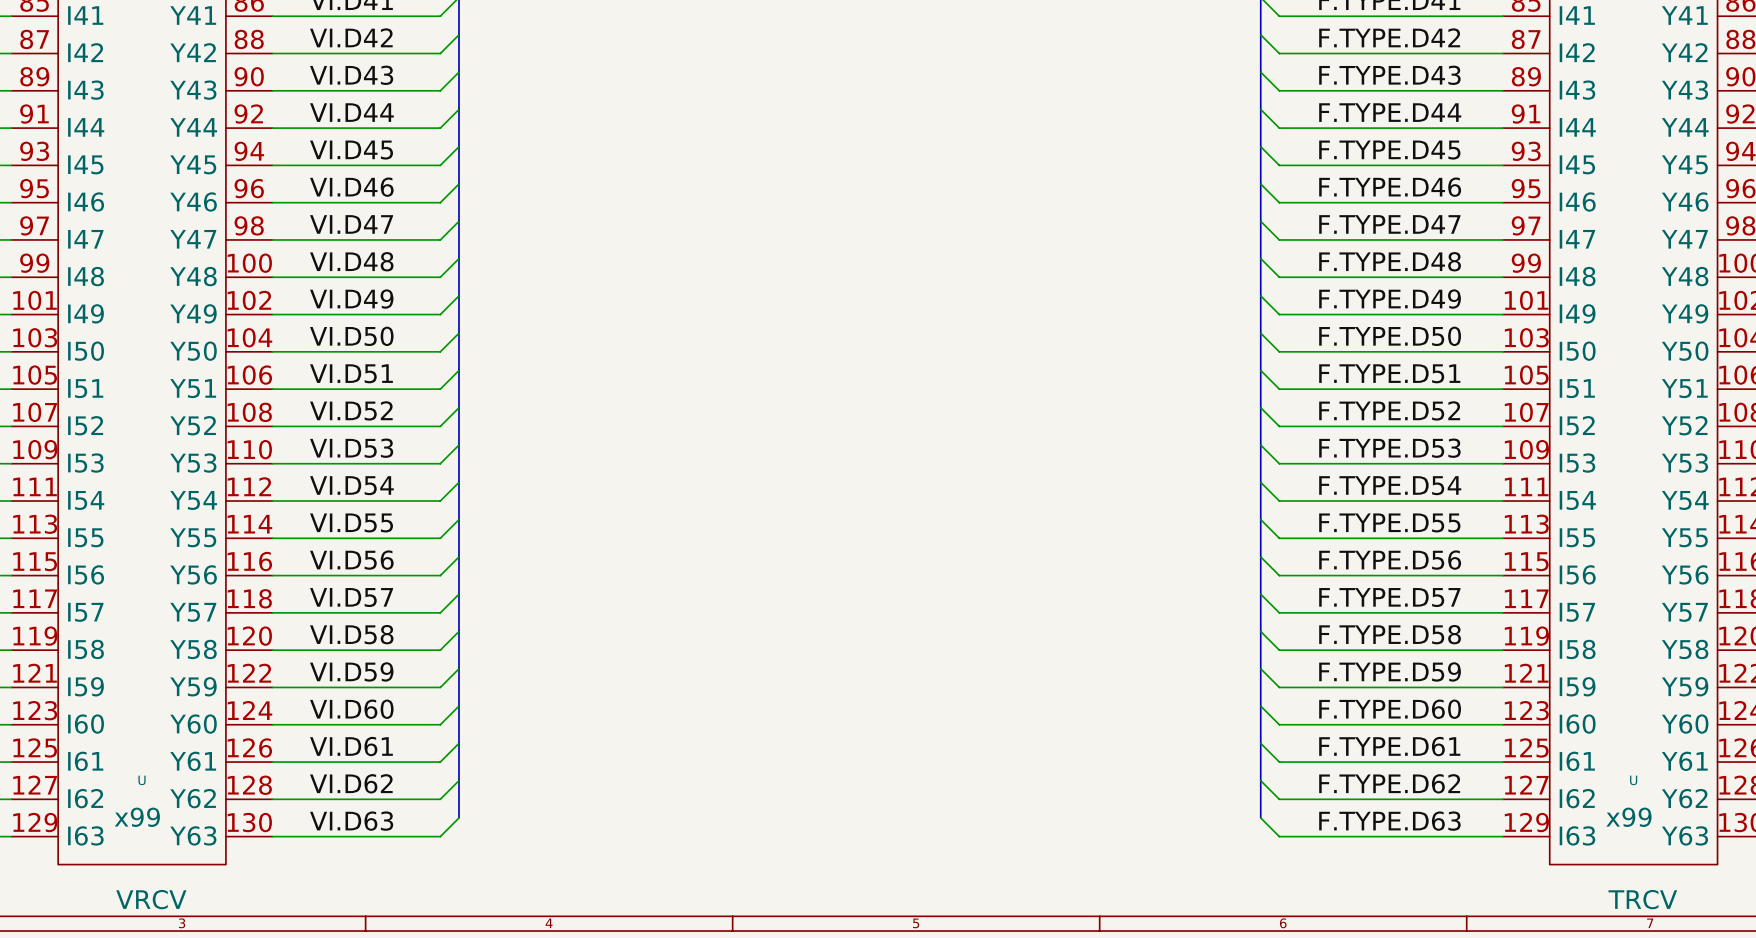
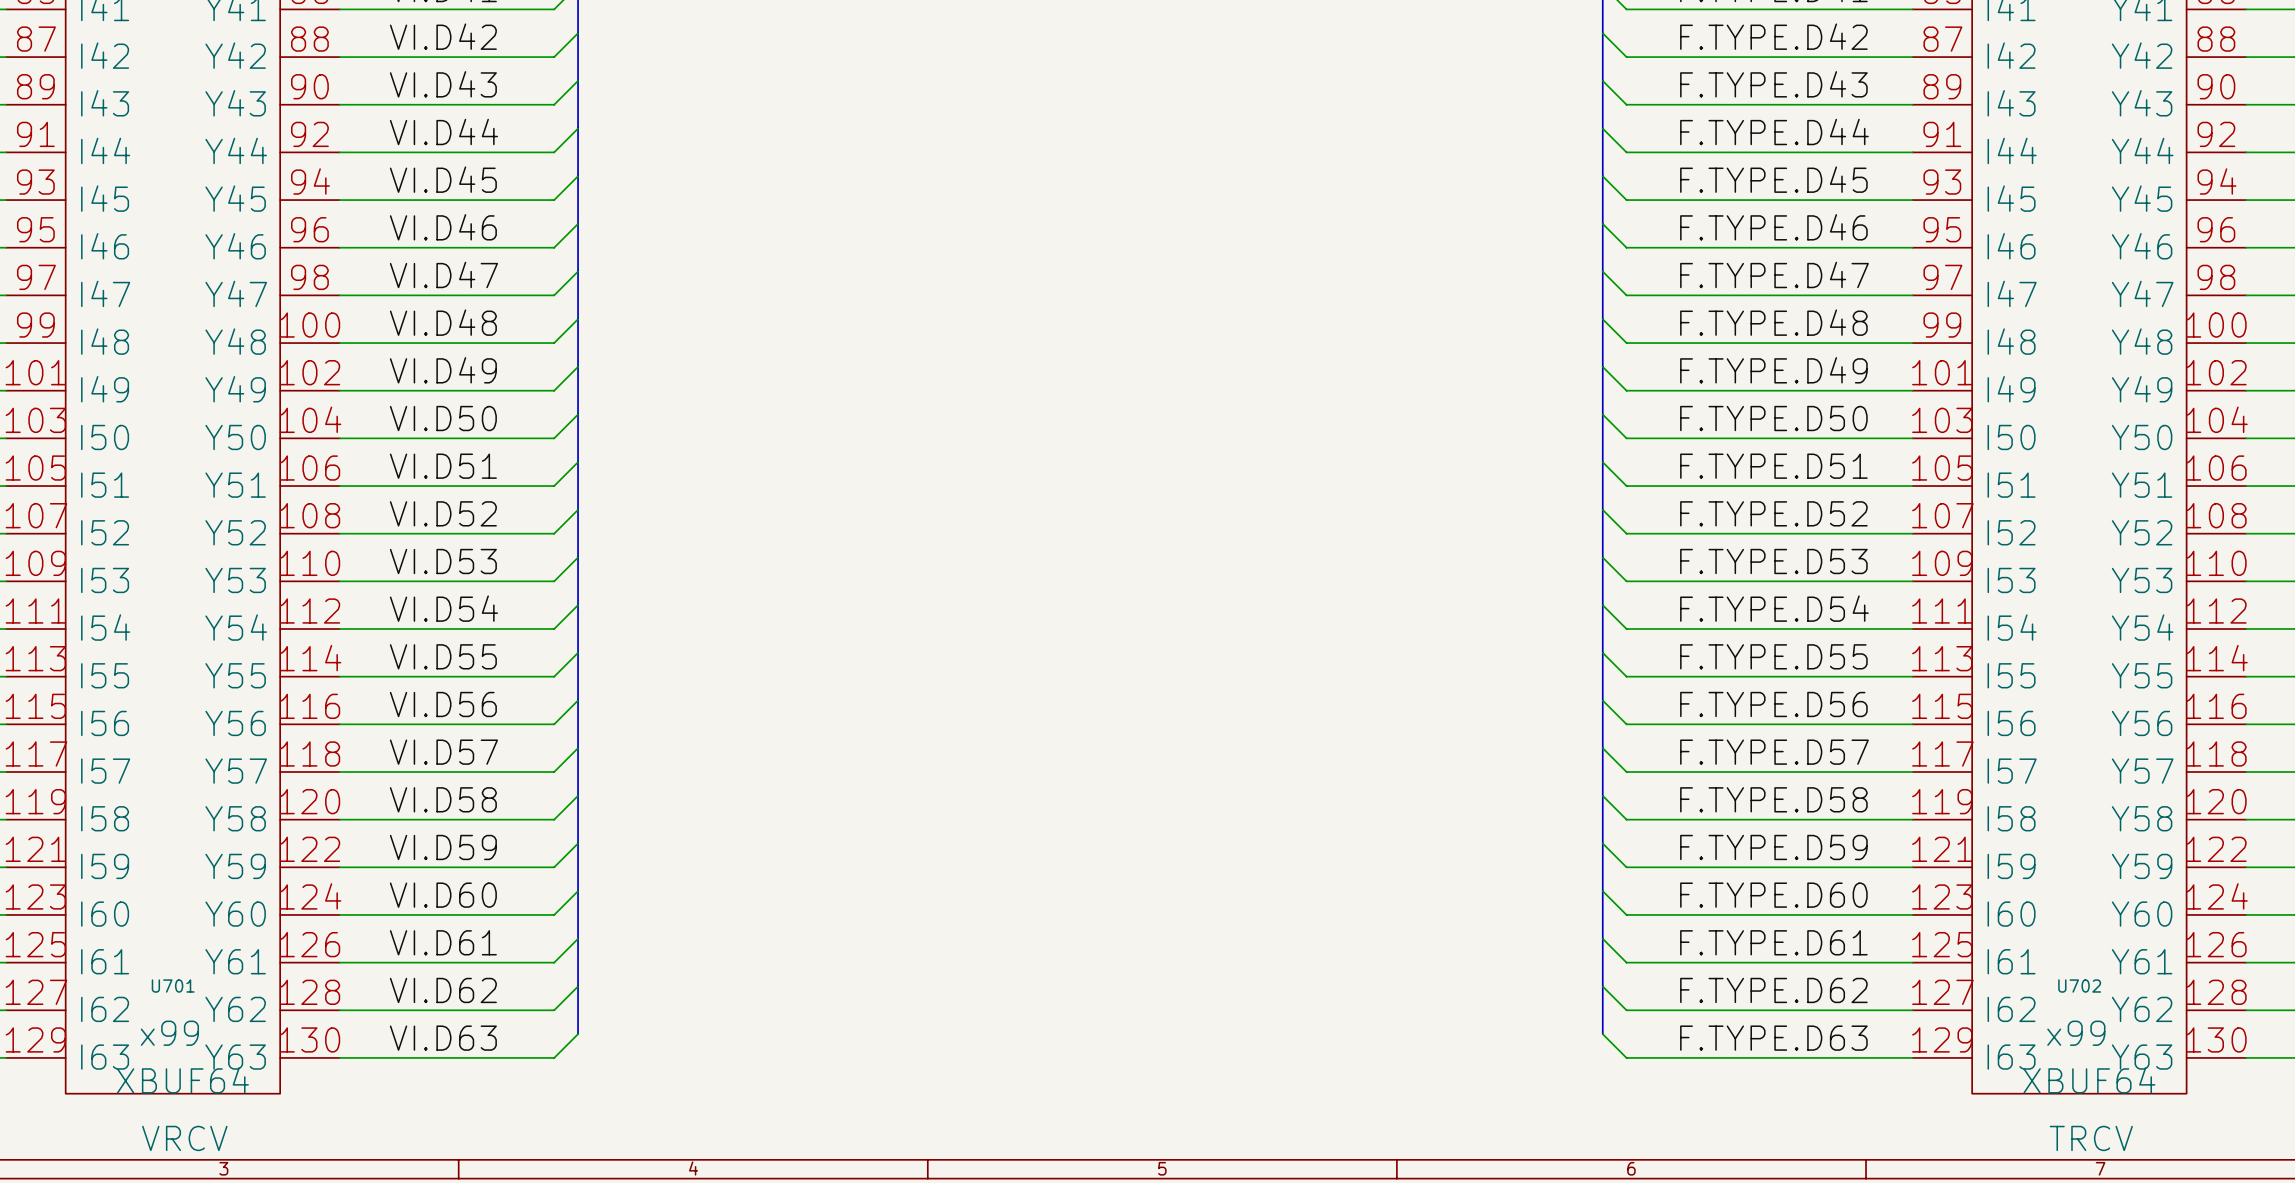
U name: U (142, 780) -> U701 (173, 986)
U name: U (1633, 780) -> U702 (2079, 986)
U value: none -> XBUF64 (182, 1080)
U value: none -> XBUF64 (2089, 1080)

